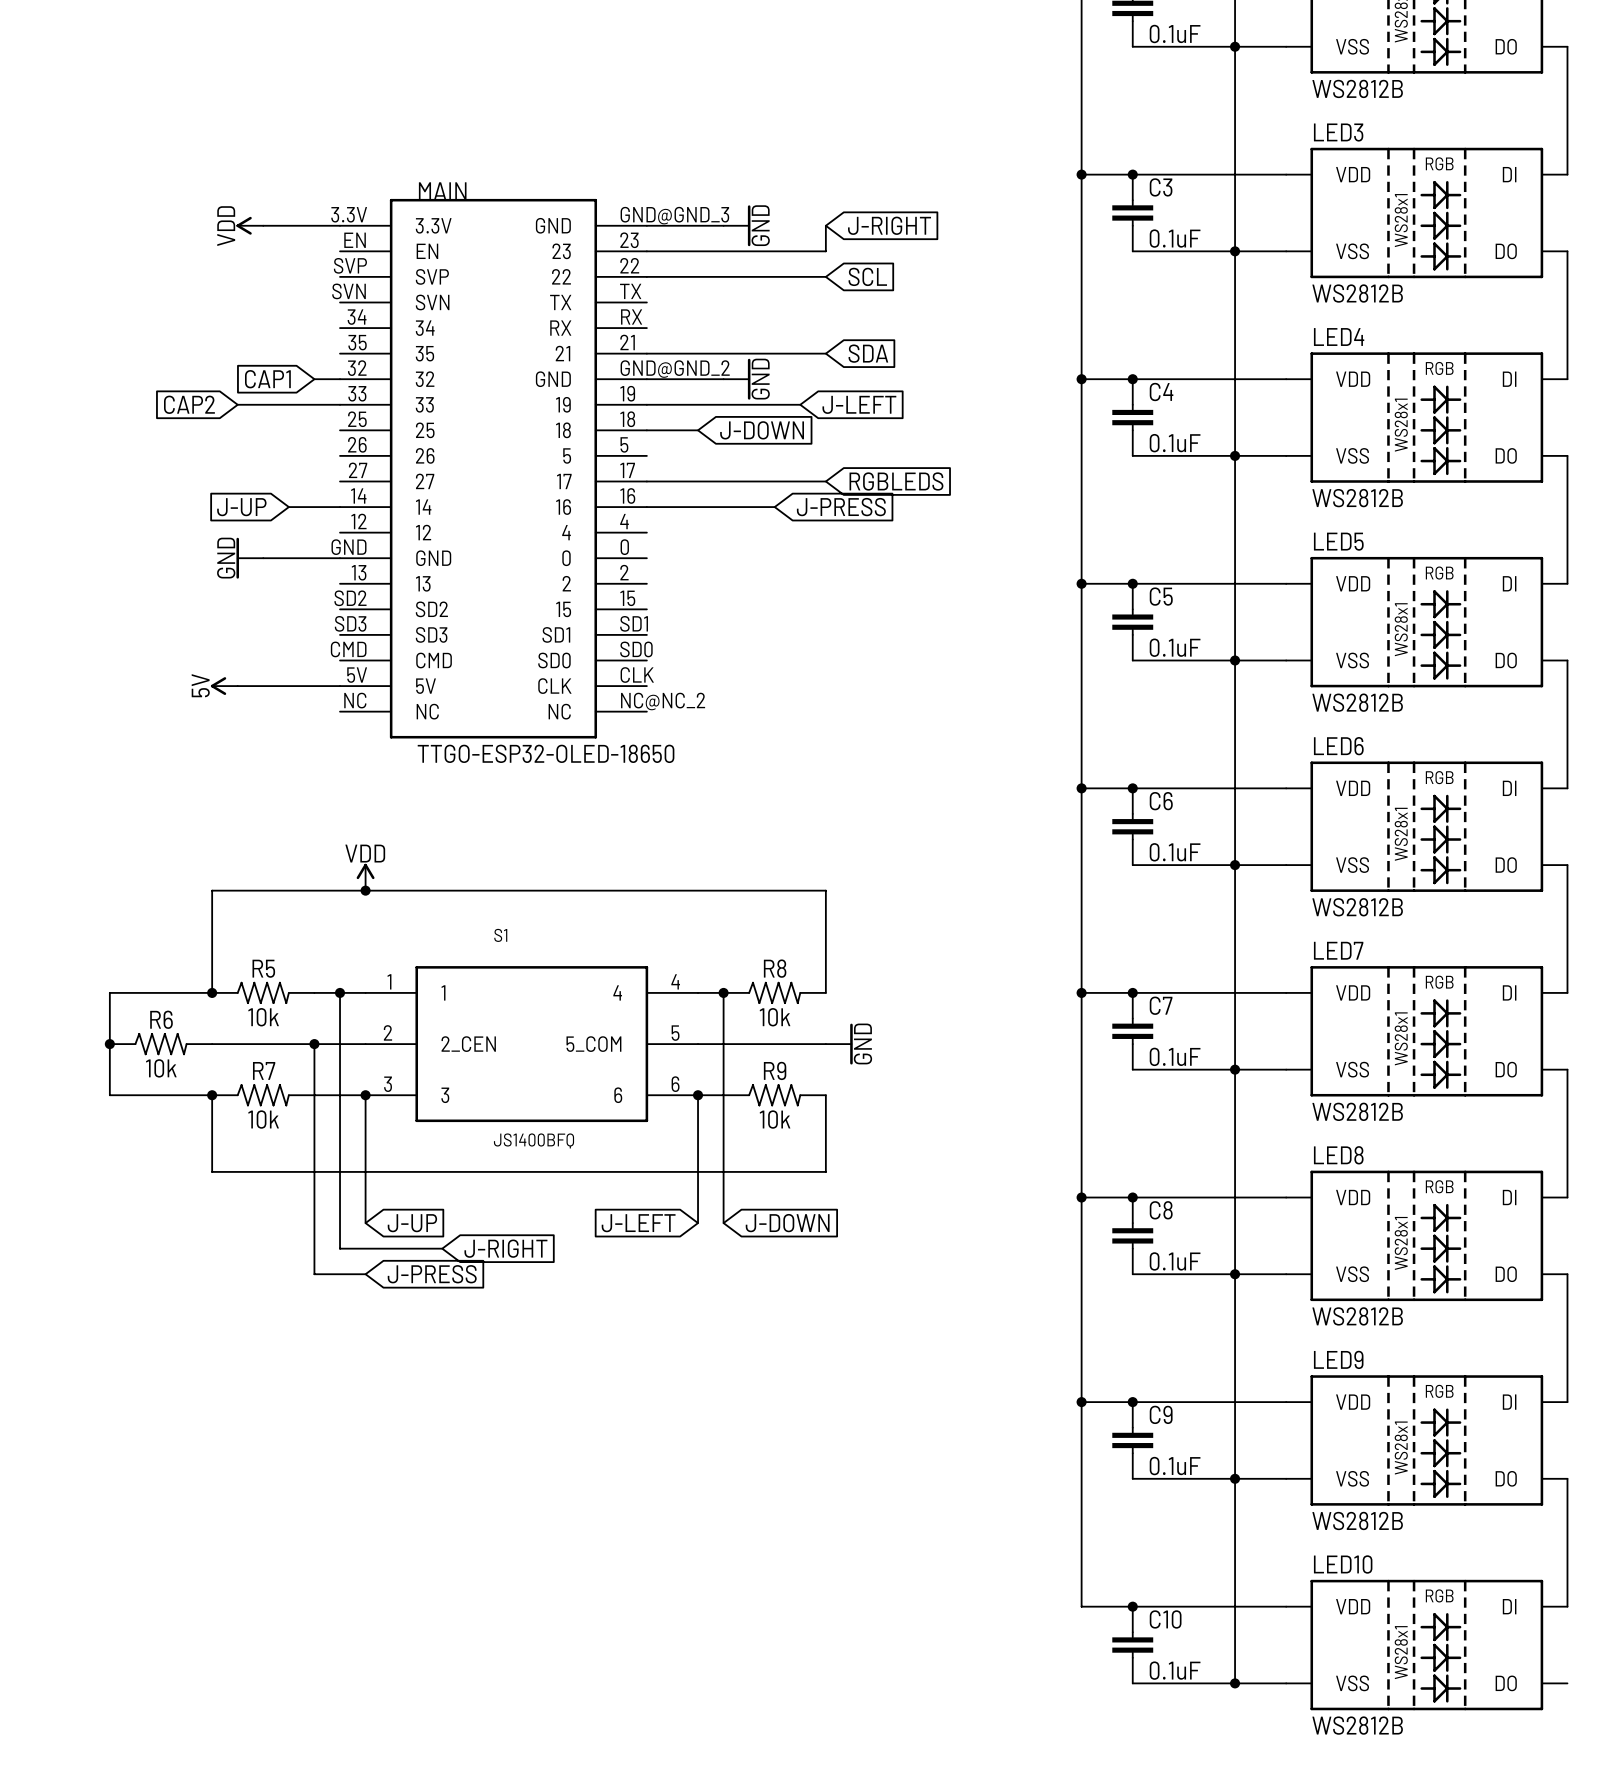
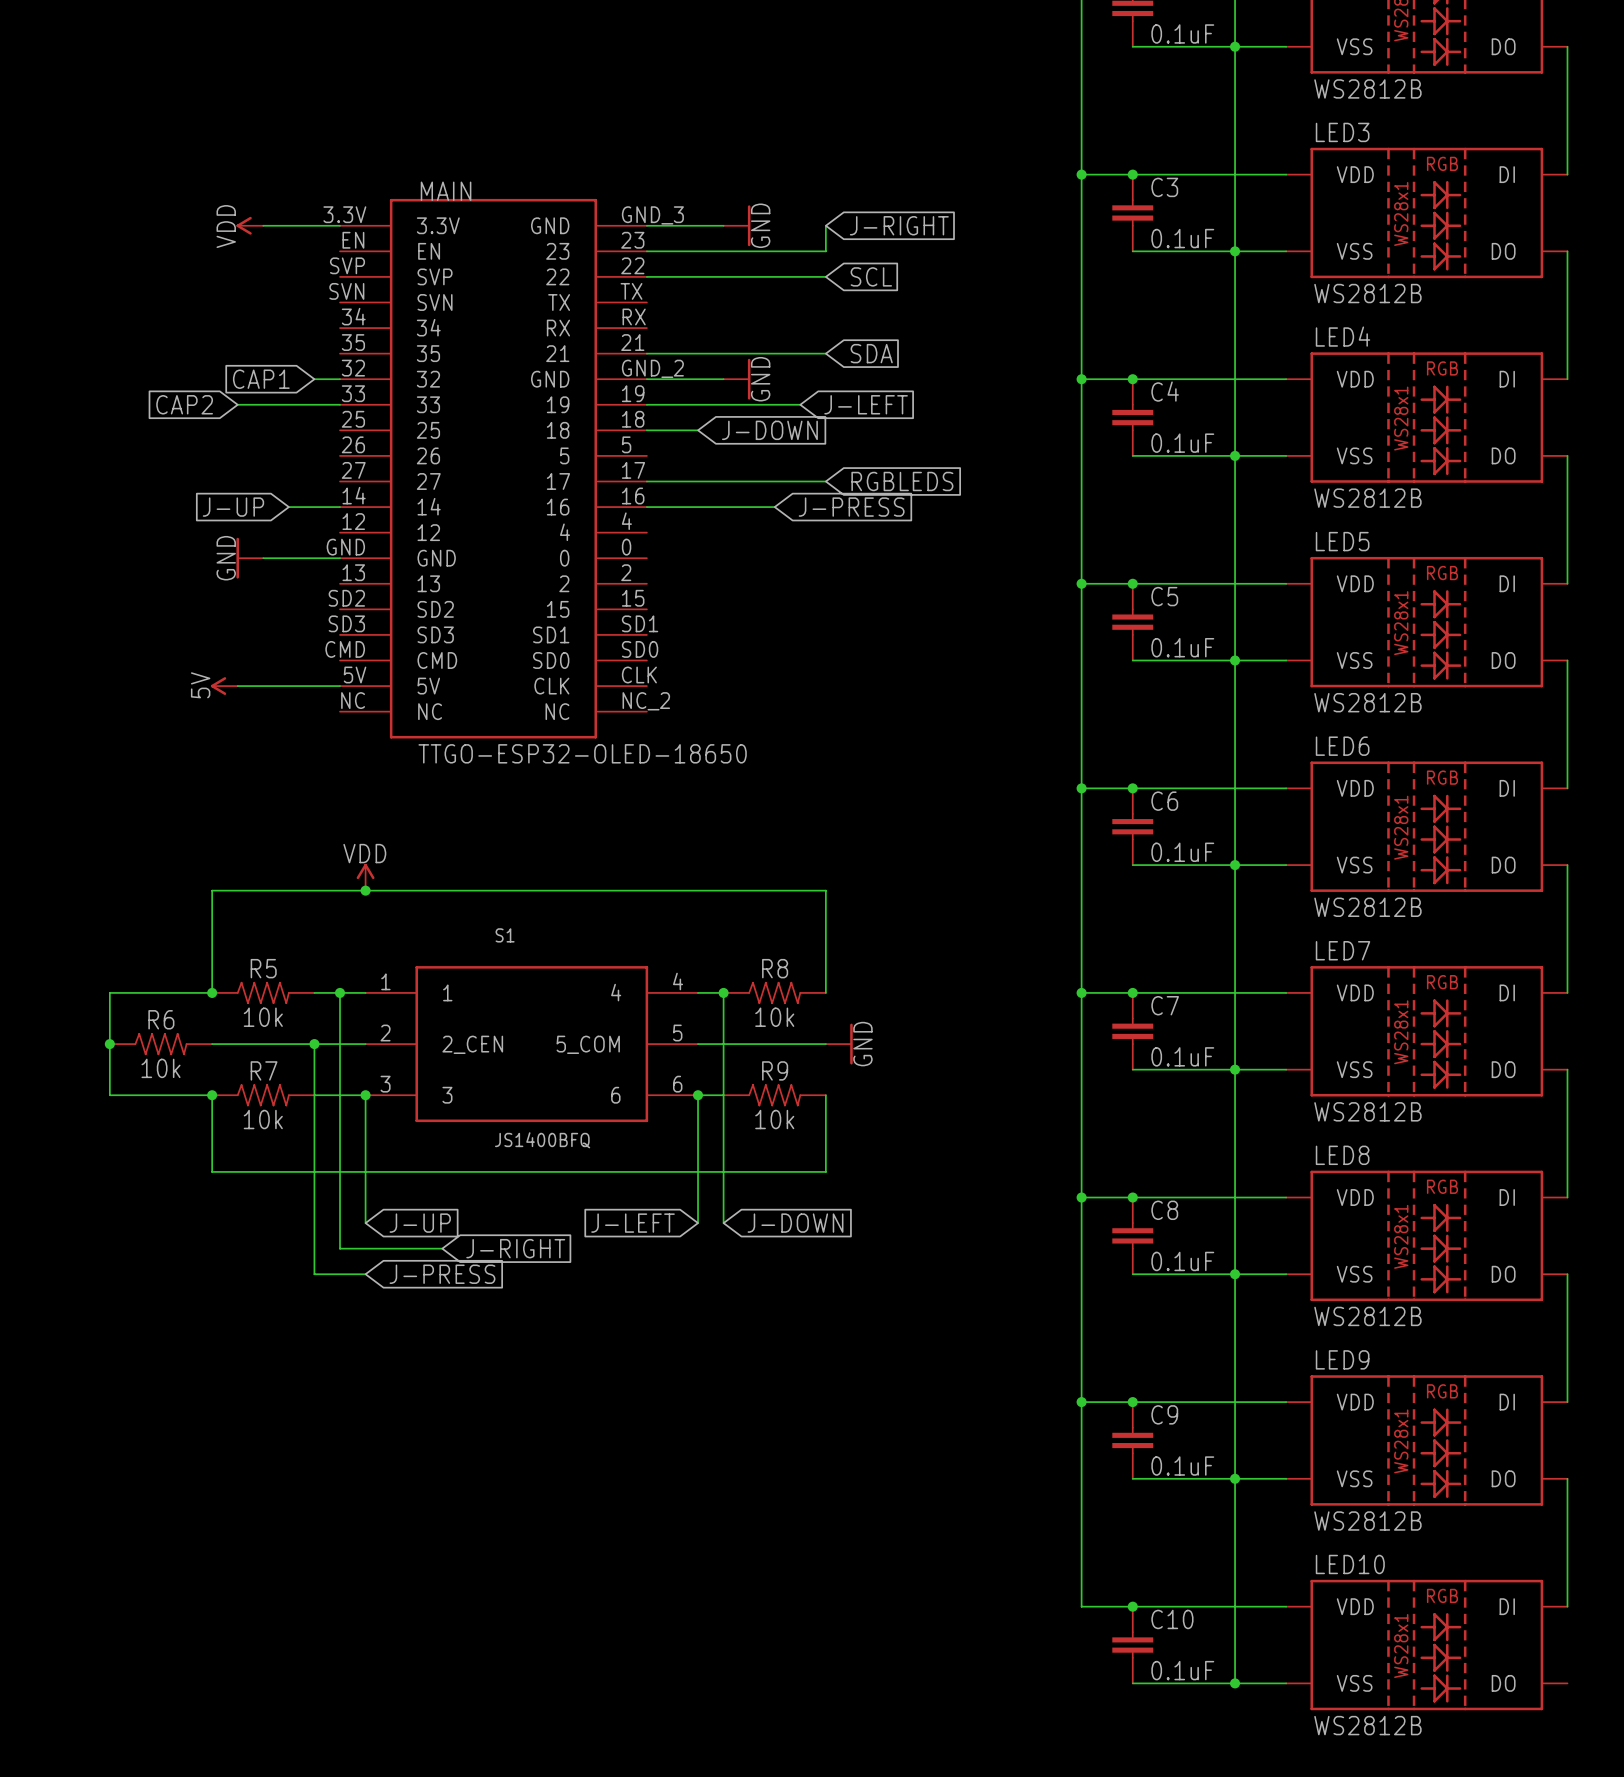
MAIN pin number: GND@GND_3 (674, 215) -> GND_3 (652, 215)
MAIN pin number: GND@GND_2 (675, 369) -> GND_2 (652, 368)
MAIN pin number: NC@NC_2 (663, 701) -> NC_2 (646, 701)

